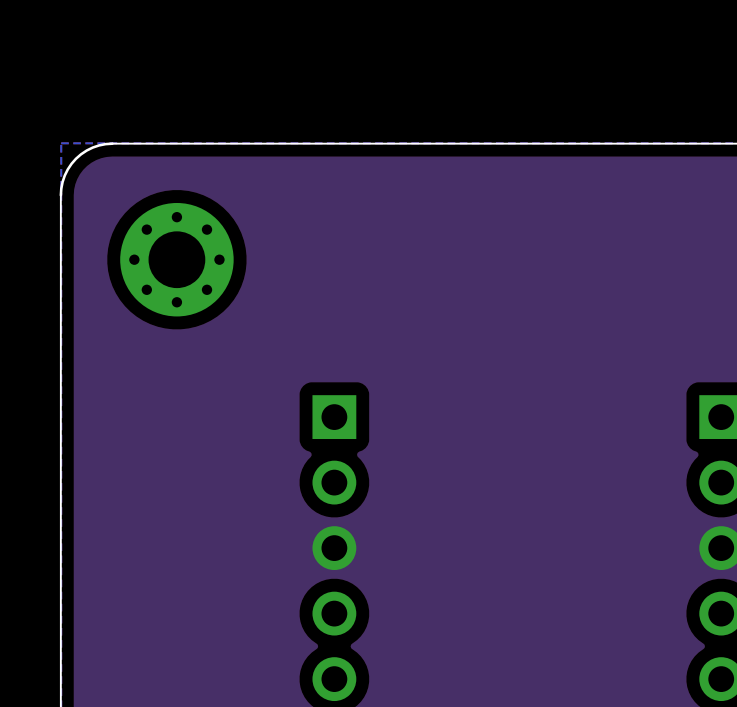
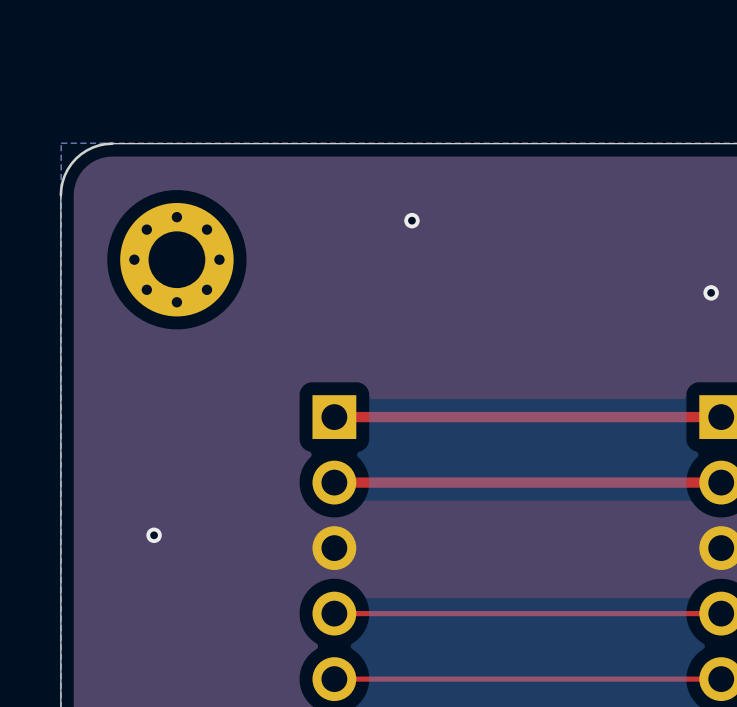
via: none -> (411, 220)
via: none -> (711, 292)
top track: none -> (721, 417) (334, 417)
top track: none -> (721, 482) (334, 482)
via: none -> (154, 535)
top track: none -> (721, 613) (334, 613)
top track: none -> (721, 679) (334, 679)

